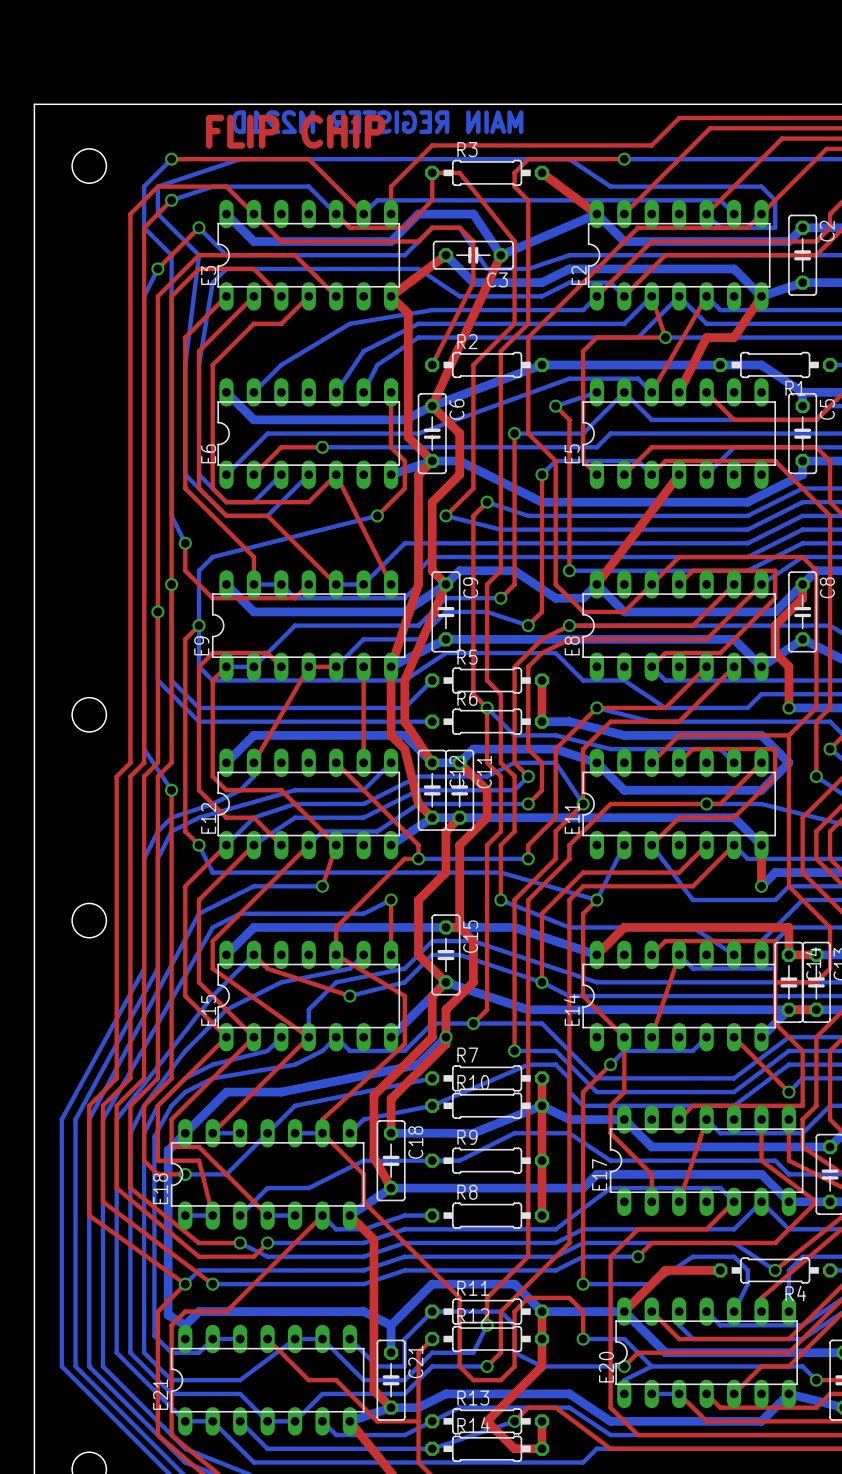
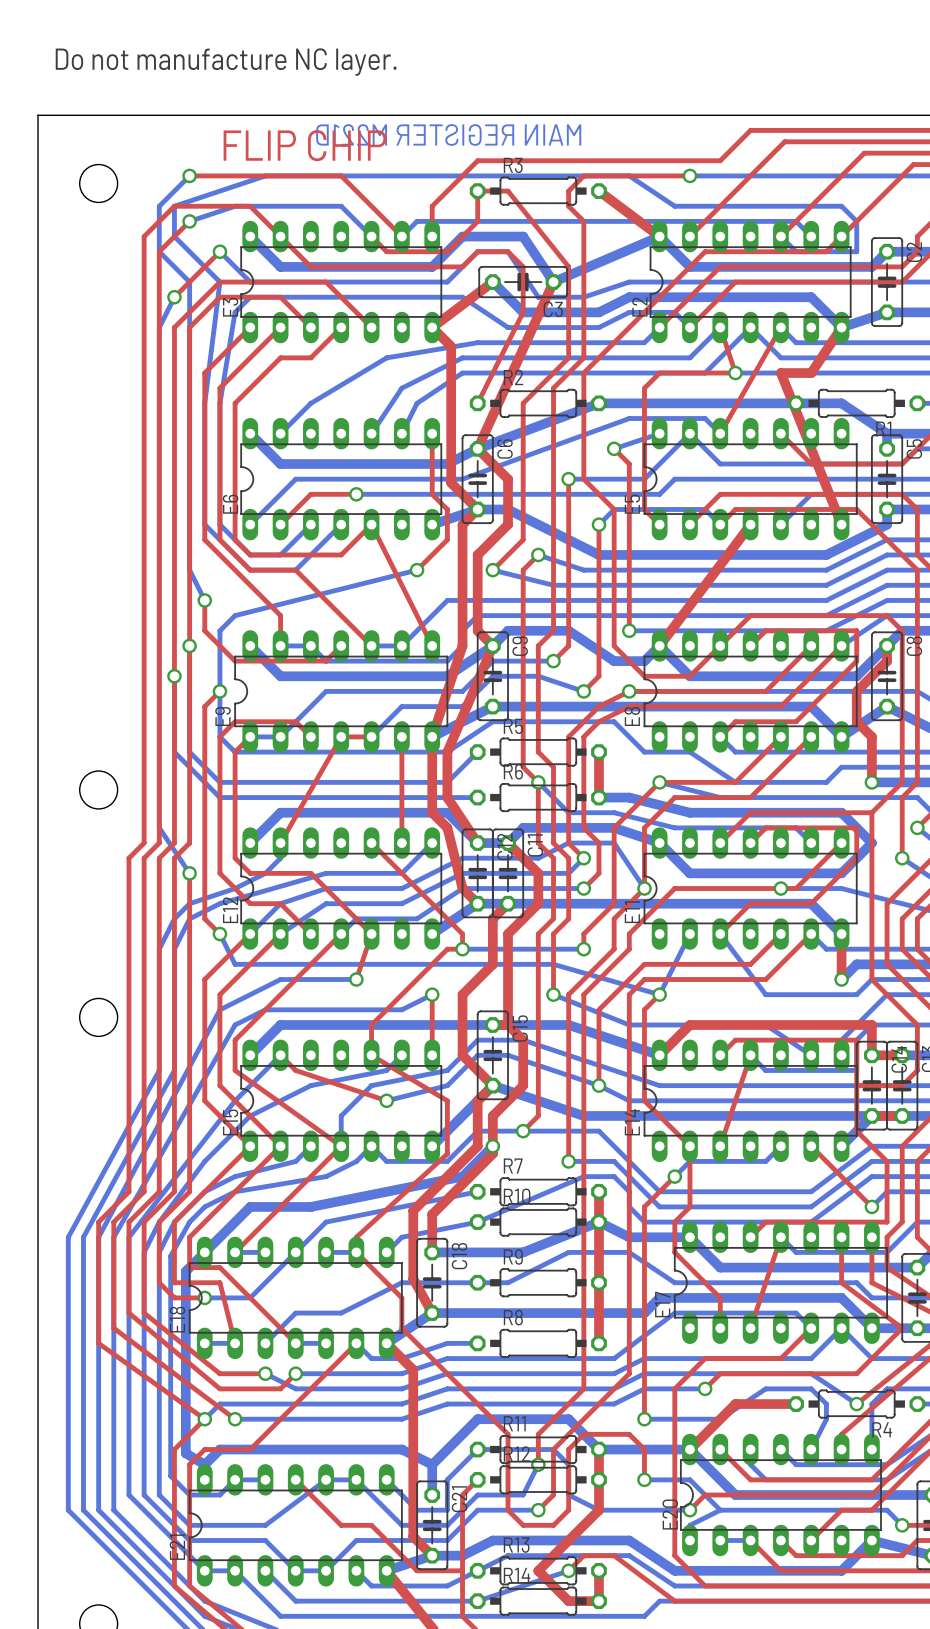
text: none -> Do not manufacture NC layer. (226, 62)
top track: (706, 337) (679, 392) -> (780, 373) (841, 524)

